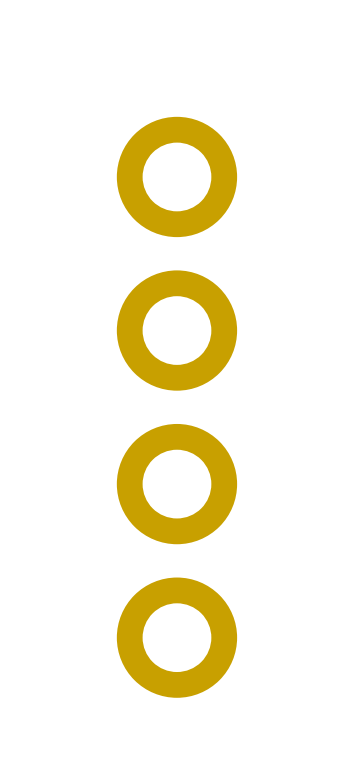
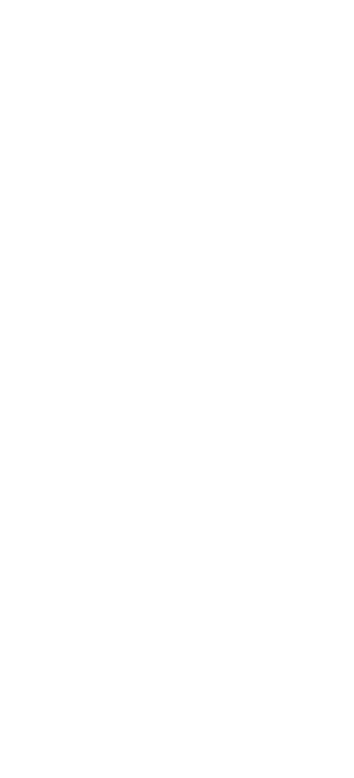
part: (176, 176) -> none
part: (176, 330) -> none
part: (176, 484) -> none
part: (176, 637) -> none

